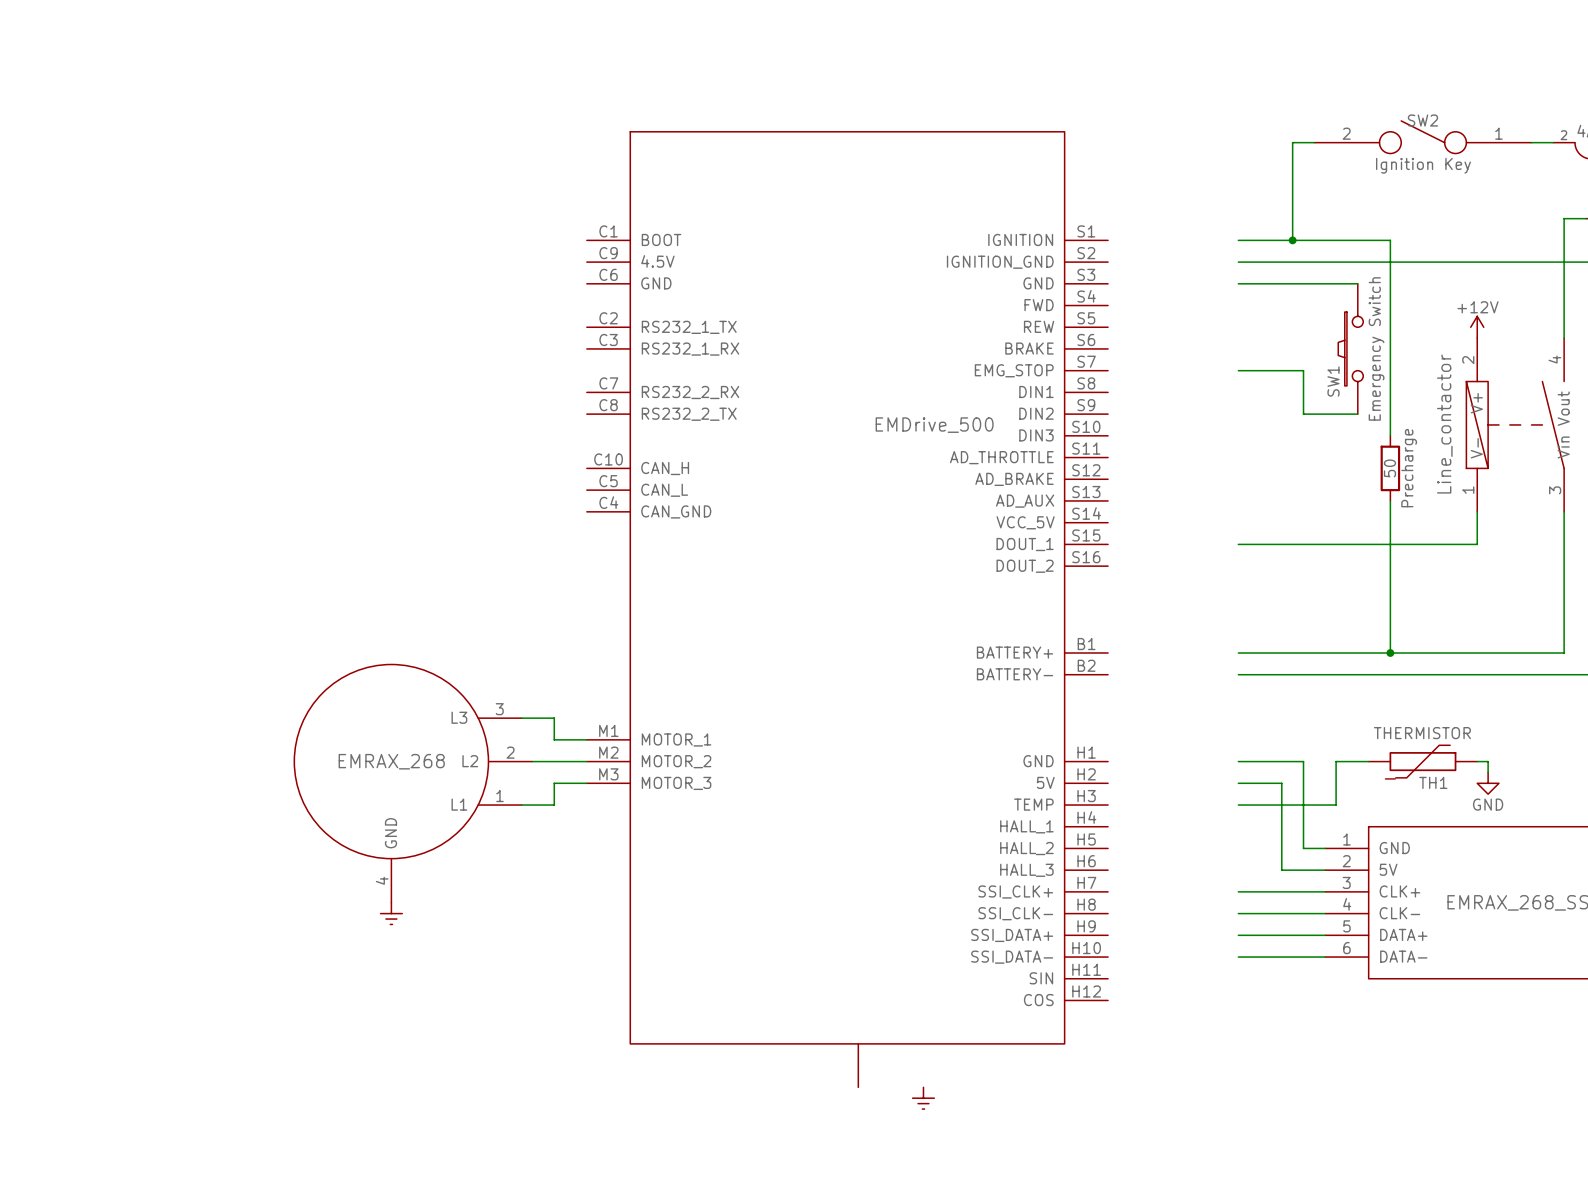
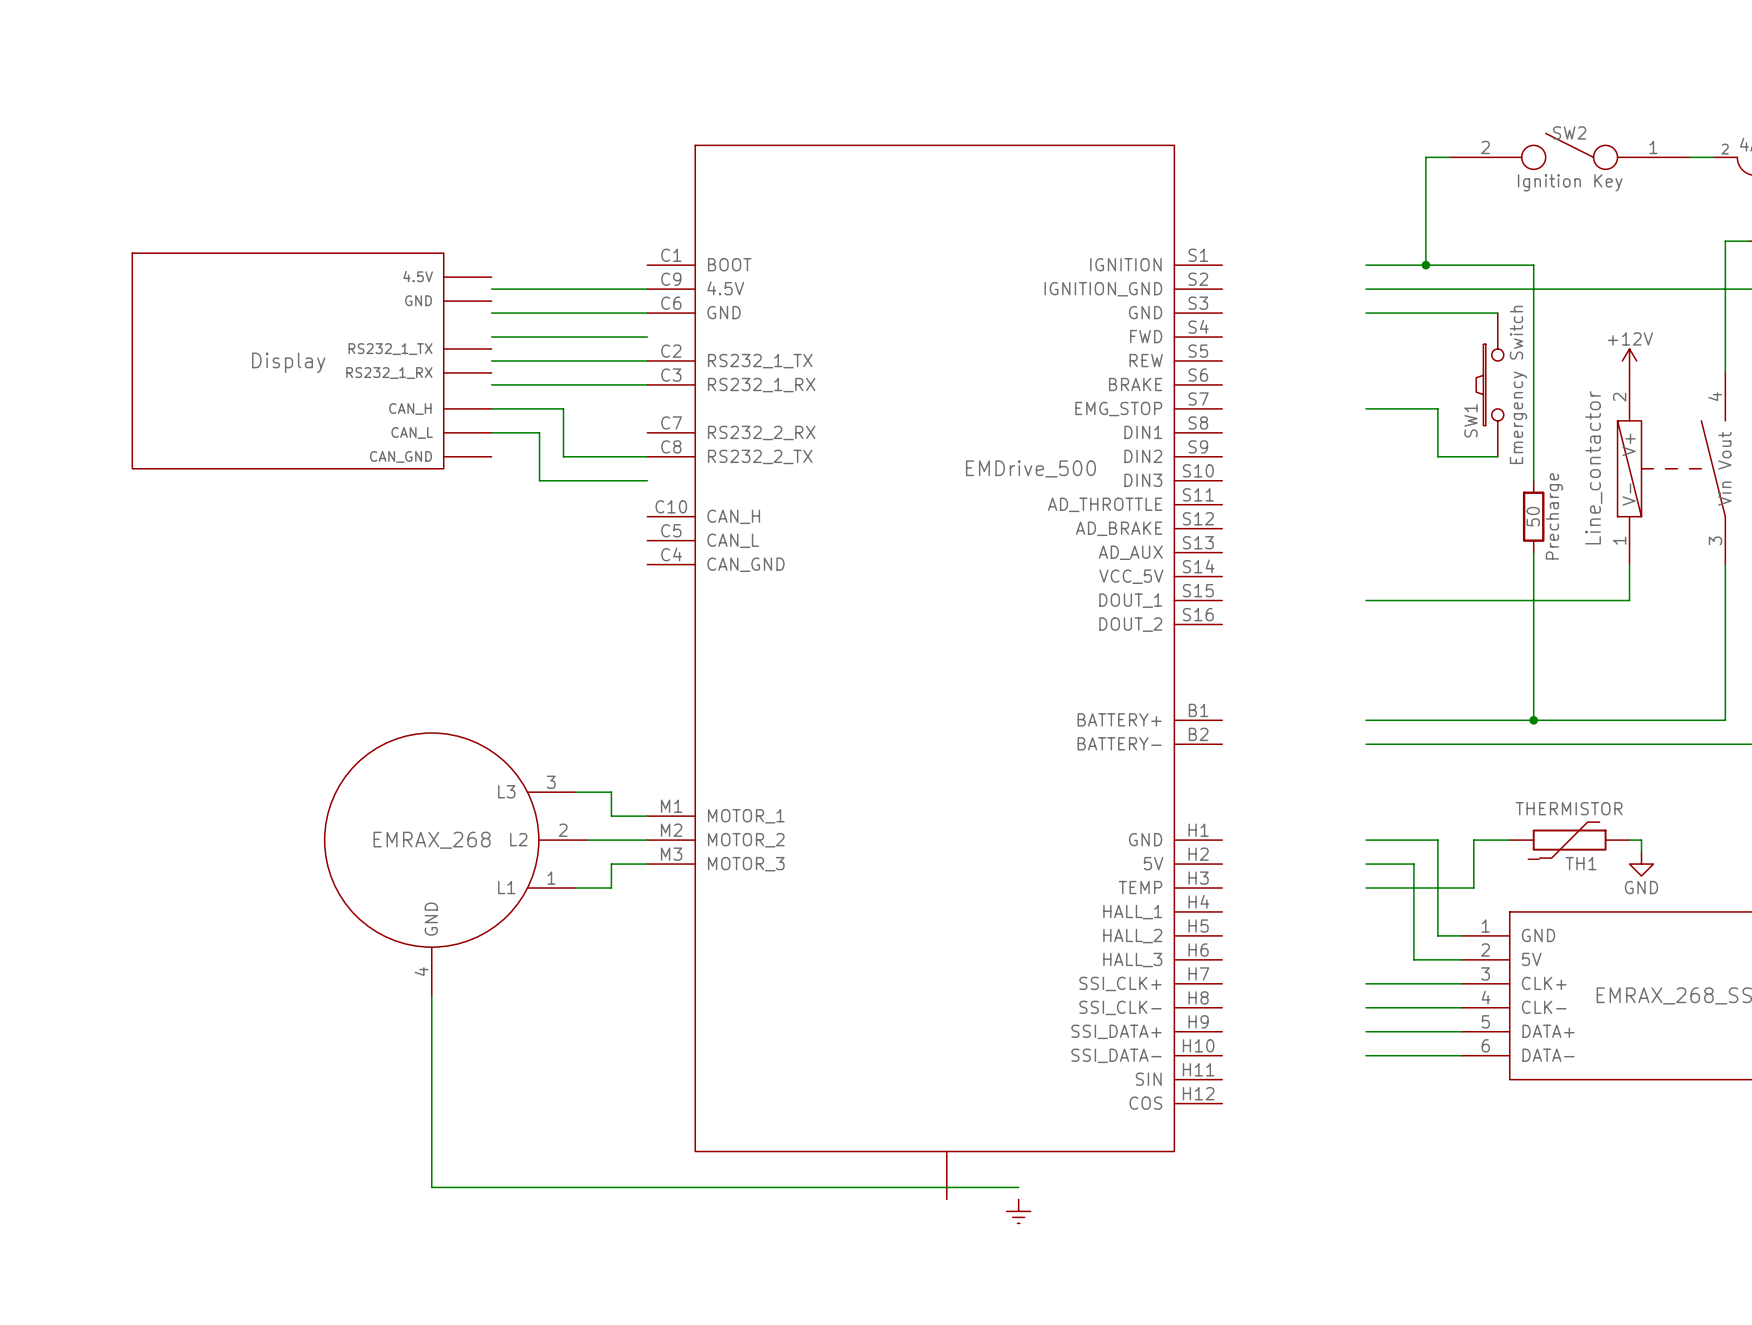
wire: none -> (491, 289) (647, 289)
wire: none -> (491, 313) (647, 313)
wire: none -> (491, 337) (647, 337)
part: none -> Display (311, 360)
wire: none -> (491, 360) (647, 360)
wire: none -> (491, 384) (647, 384)
wire: none -> (491, 408) (563, 408) (563, 456) (647, 456)
wire: none -> (491, 432) (539, 432) (539, 480) (647, 480)
wire: none -> (431, 995) (431, 1187) (1018, 1187)
power symbol: (391, 913) -> none

